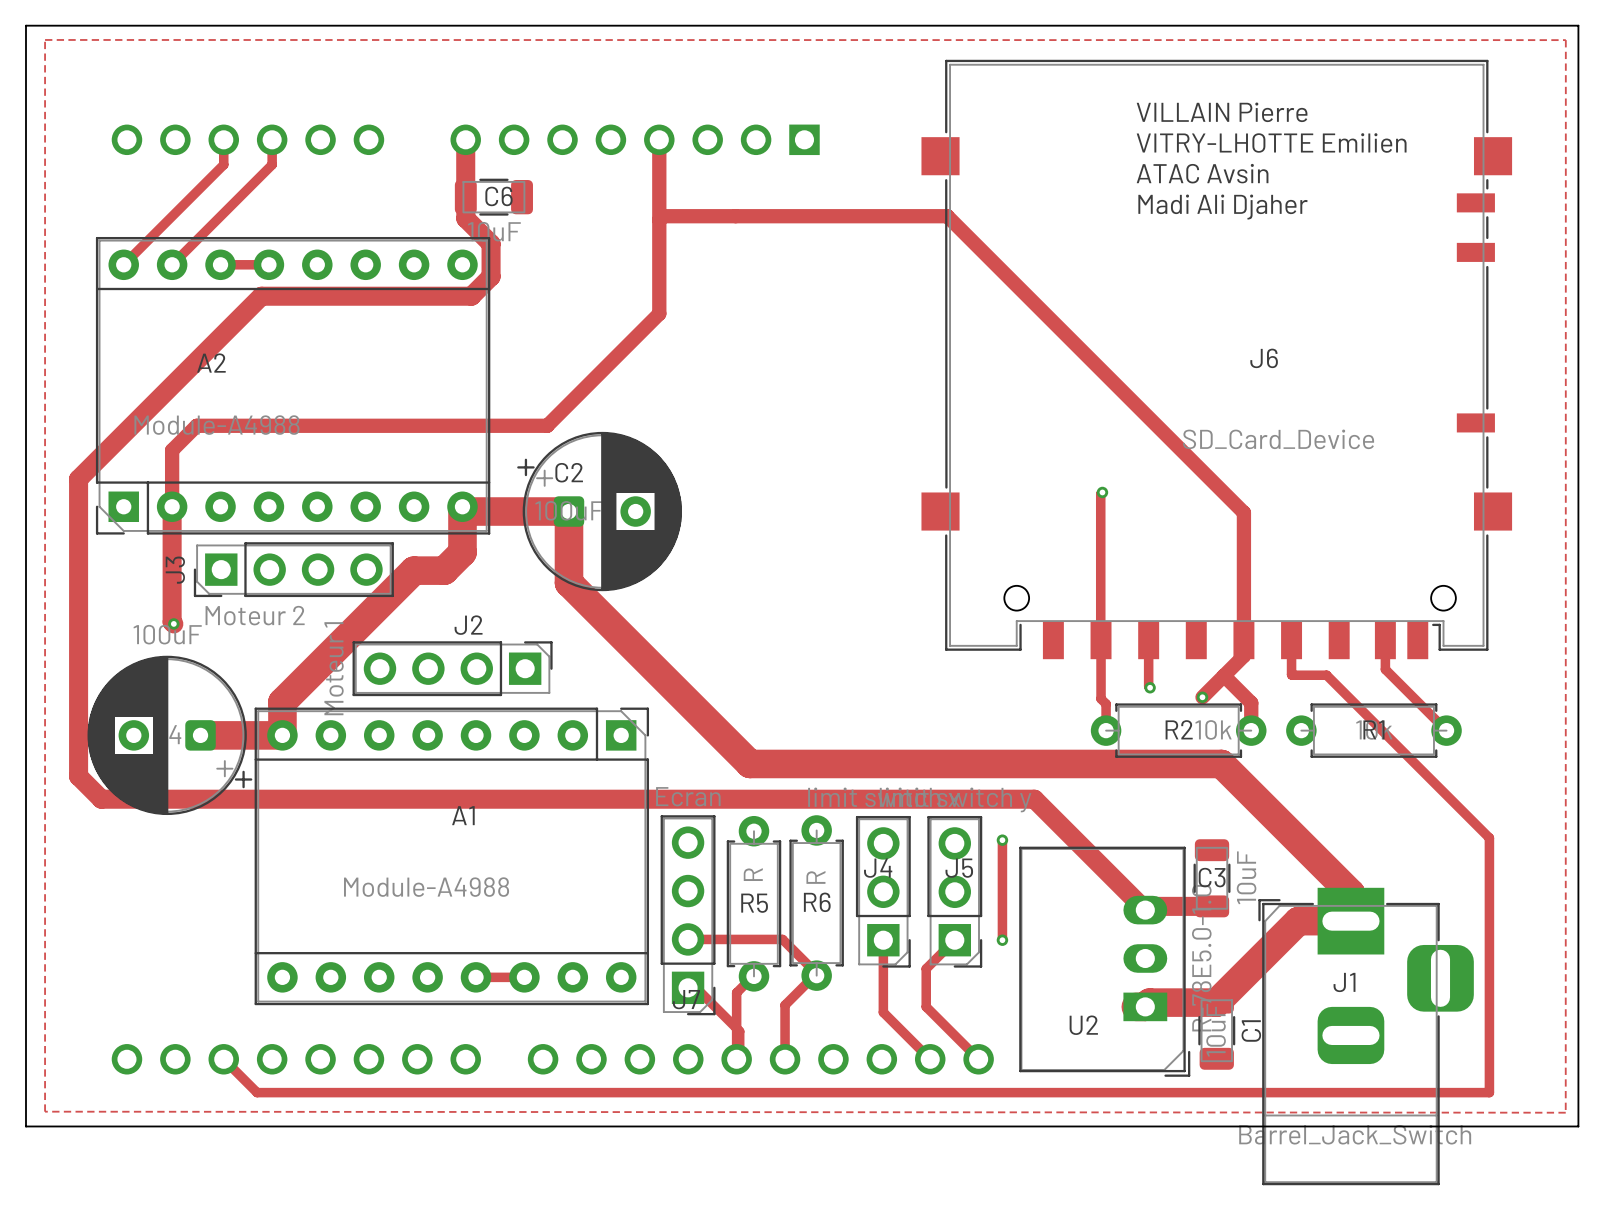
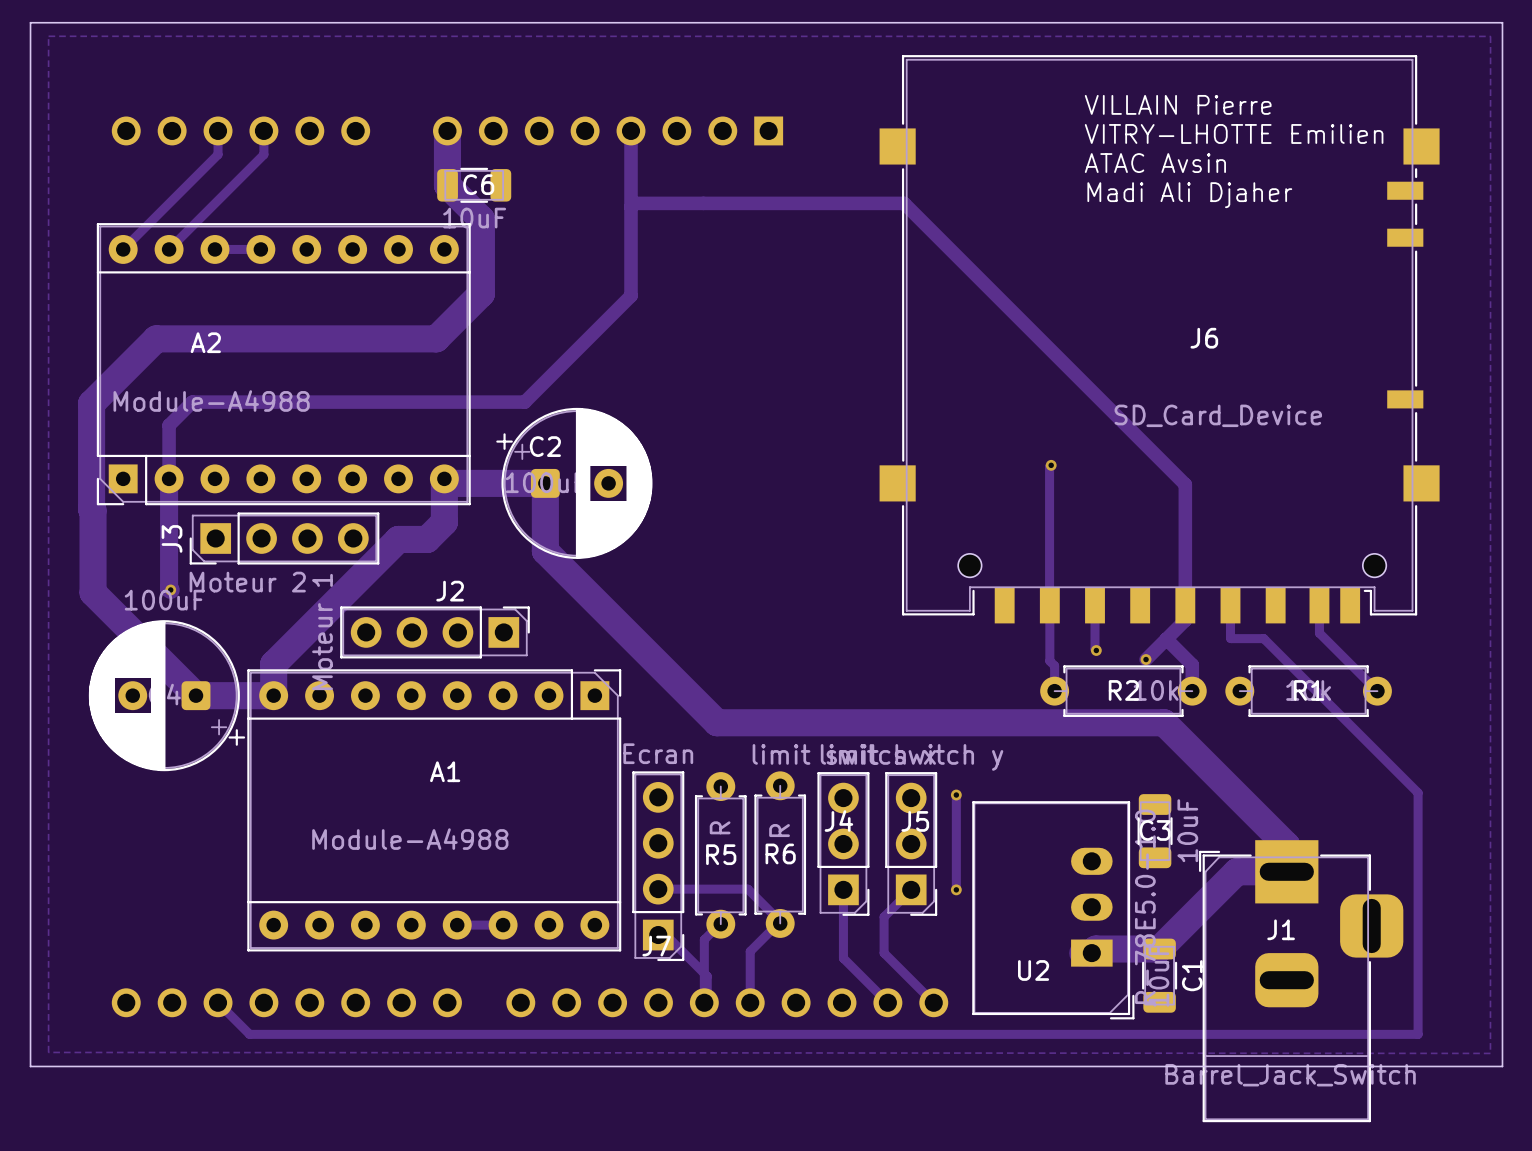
track: (465, 139) (465, 218) (491, 243) (491, 276) (471, 296) (261, 296) (78, 479) (78, 776) (101, 799) (1034, 799) (1145, 910) (1149, 906) (1212, 906) -> (447, 130) (447, 185) (481, 219) (481, 293) (436, 338) (156, 338) (91, 403) (93, 592) (195, 695)

